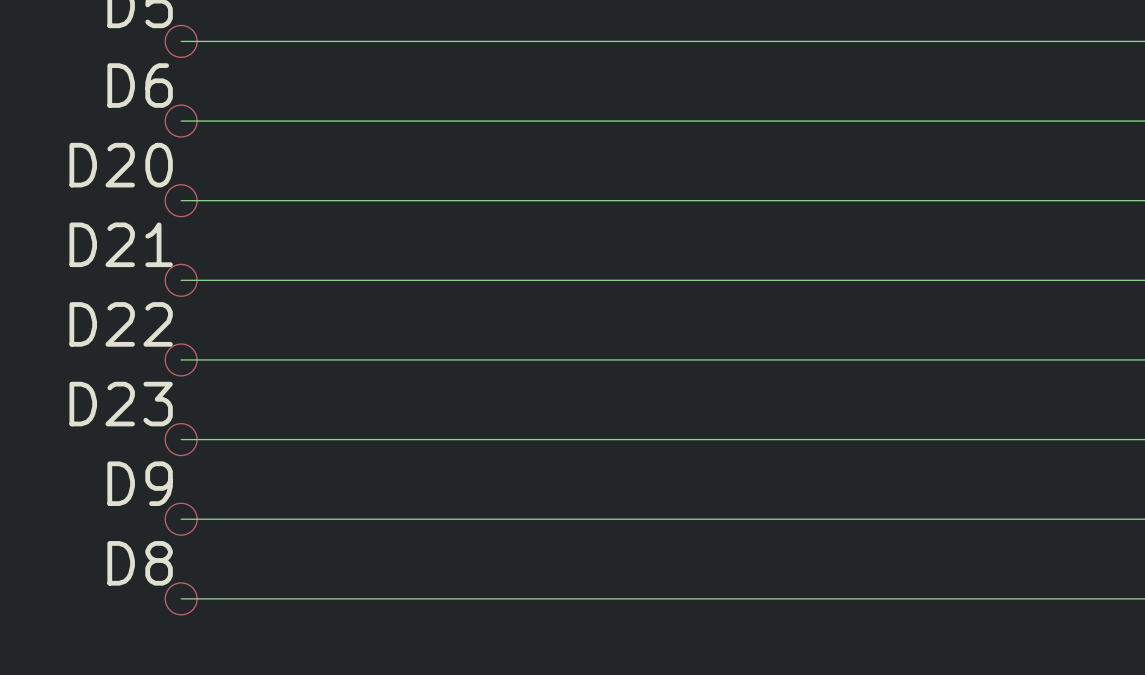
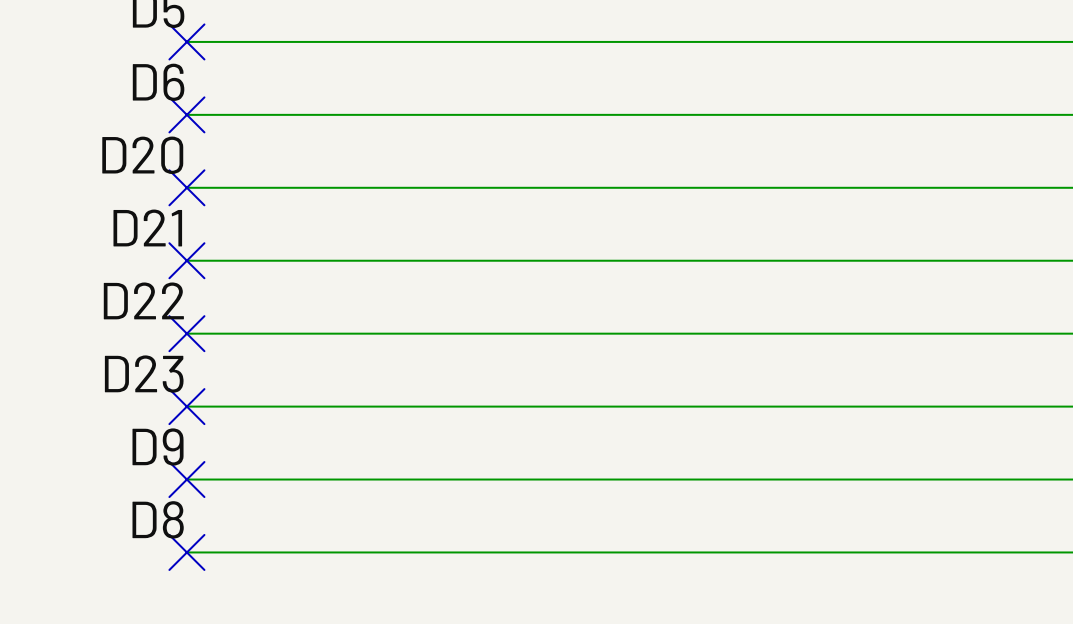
power symbol: (181, 41) -> none
no-connect mark: none -> (186, 41)
power symbol: (181, 121) -> none
no-connect mark: none -> (186, 114)
power symbol: (181, 200) -> none
no-connect mark: none -> (186, 187)
power symbol: (181, 280) -> none
no-connect mark: none -> (186, 260)
power symbol: (181, 359) -> none
no-connect mark: none -> (186, 333)
power symbol: (181, 439) -> none
no-connect mark: none -> (186, 406)
power symbol: (181, 519) -> none
no-connect mark: none -> (186, 479)
power symbol: (181, 598) -> none
no-connect mark: none -> (186, 552)

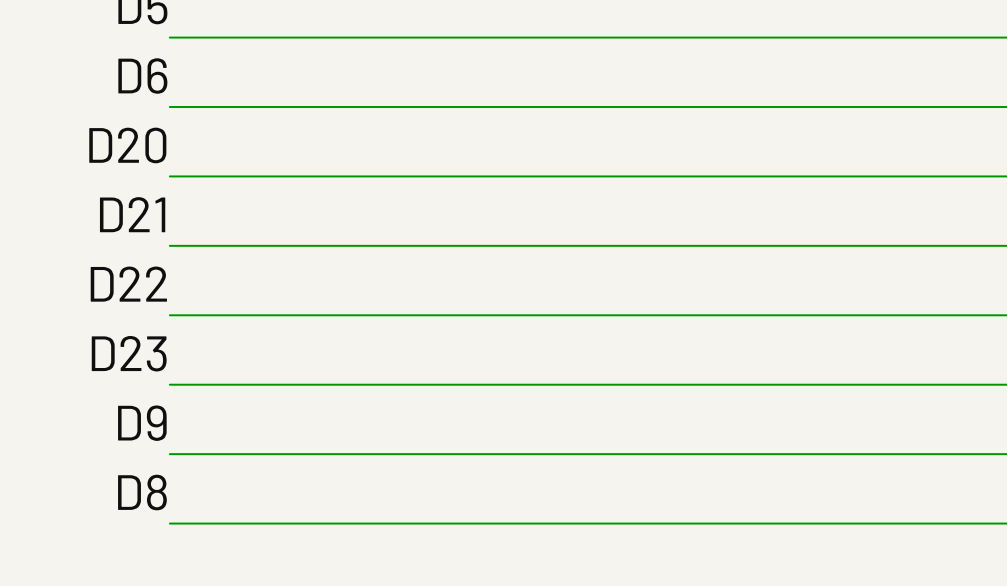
no-connect mark: (186, 41) -> none
no-connect mark: (186, 114) -> none
no-connect mark: (186, 187) -> none
no-connect mark: (186, 260) -> none
no-connect mark: (186, 333) -> none
no-connect mark: (186, 406) -> none
no-connect mark: (186, 479) -> none
no-connect mark: (186, 552) -> none

